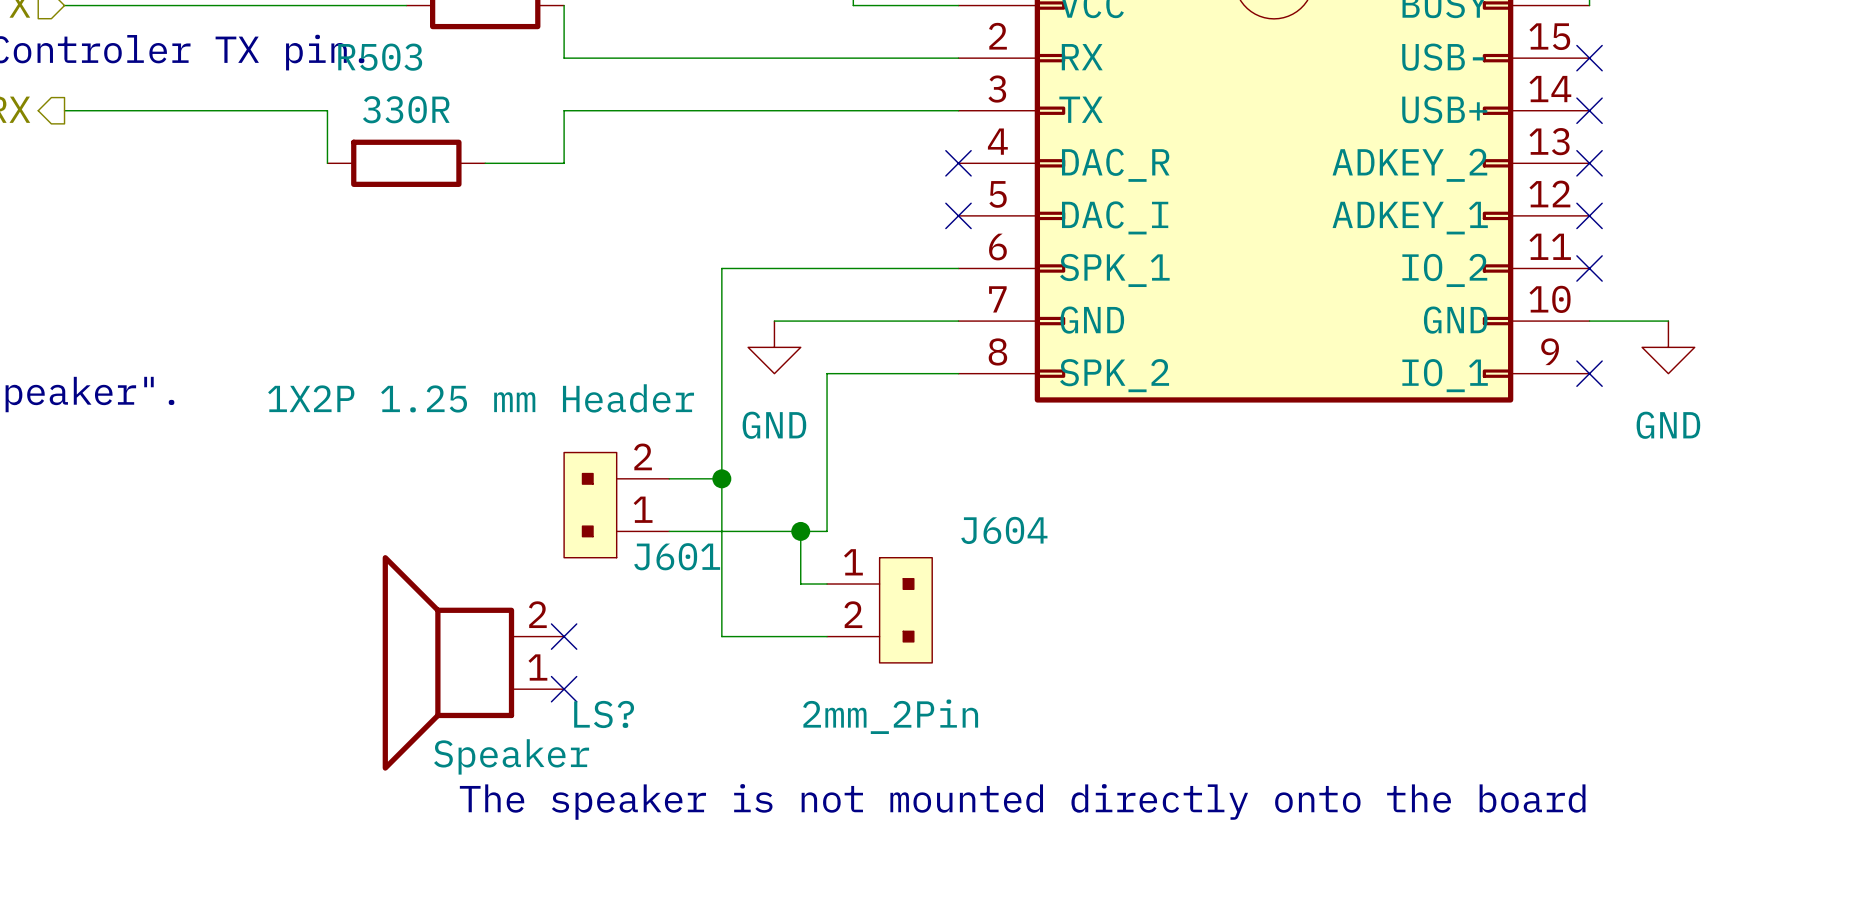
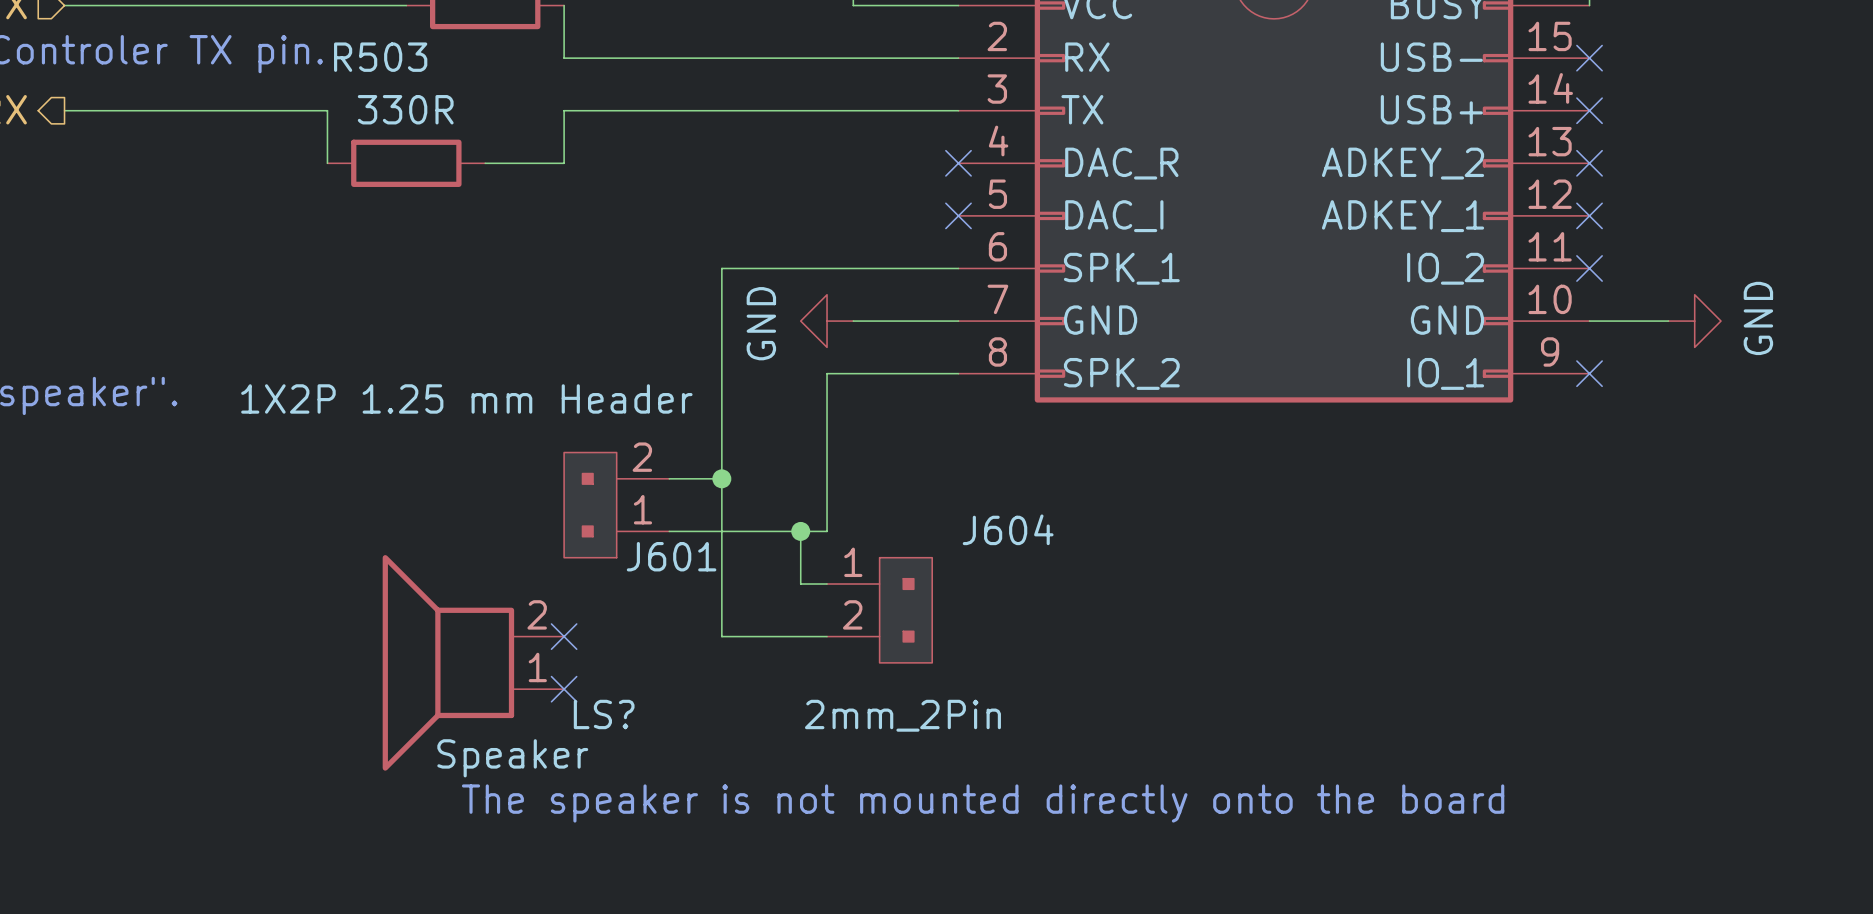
wire: (774, 321) (853, 321) -> none
power symbol rotation: 0° (774, 347) -> 90° clockwise (827, 321)
power symbol position: GND (774, 347) -> GND (827, 321)
power symbol rotation: 0° (1668, 347) -> 90° counterclockwise (1694, 321)
power symbol position: GND (1668, 347) -> GND (1694, 321)

